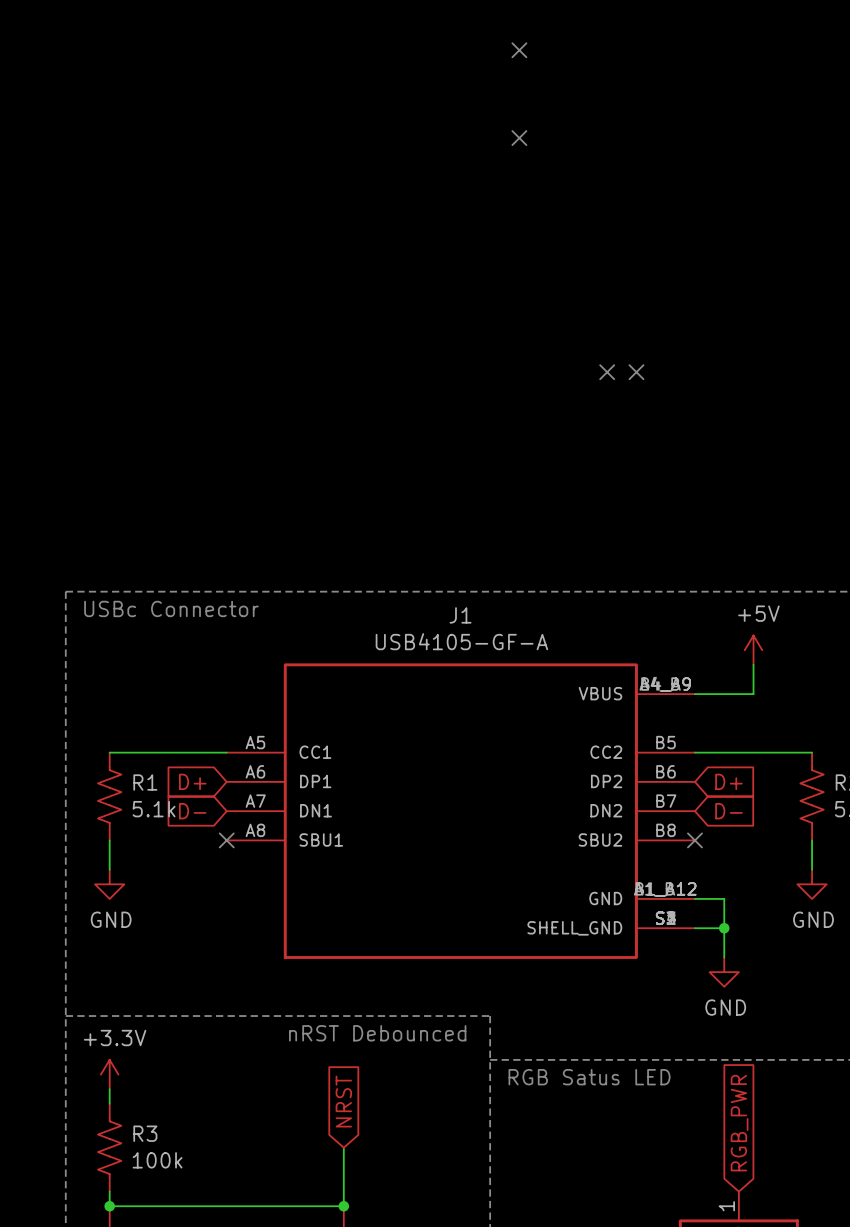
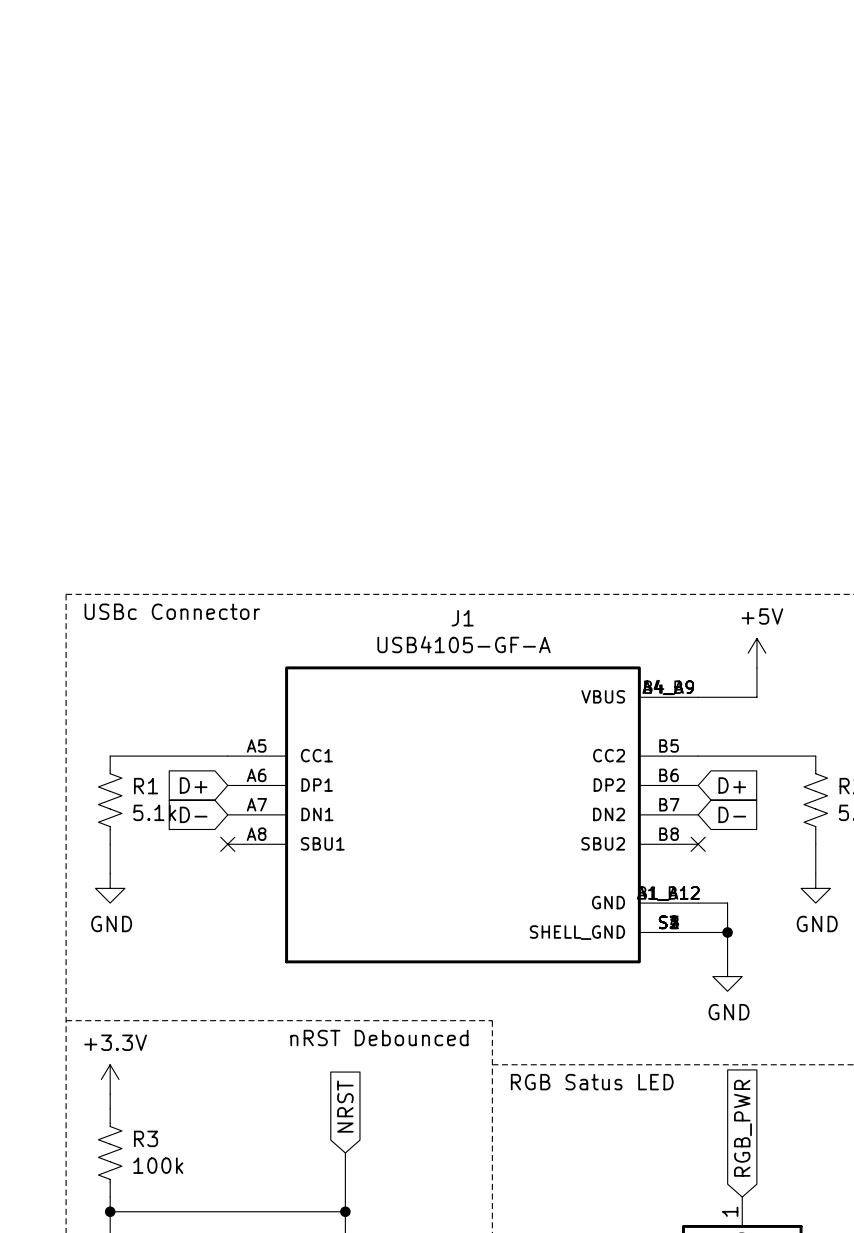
no-connect mark: (519, 50) -> none
no-connect mark: (519, 138) -> none
no-connect mark: (607, 372) -> none
no-connect mark: (636, 372) -> none

